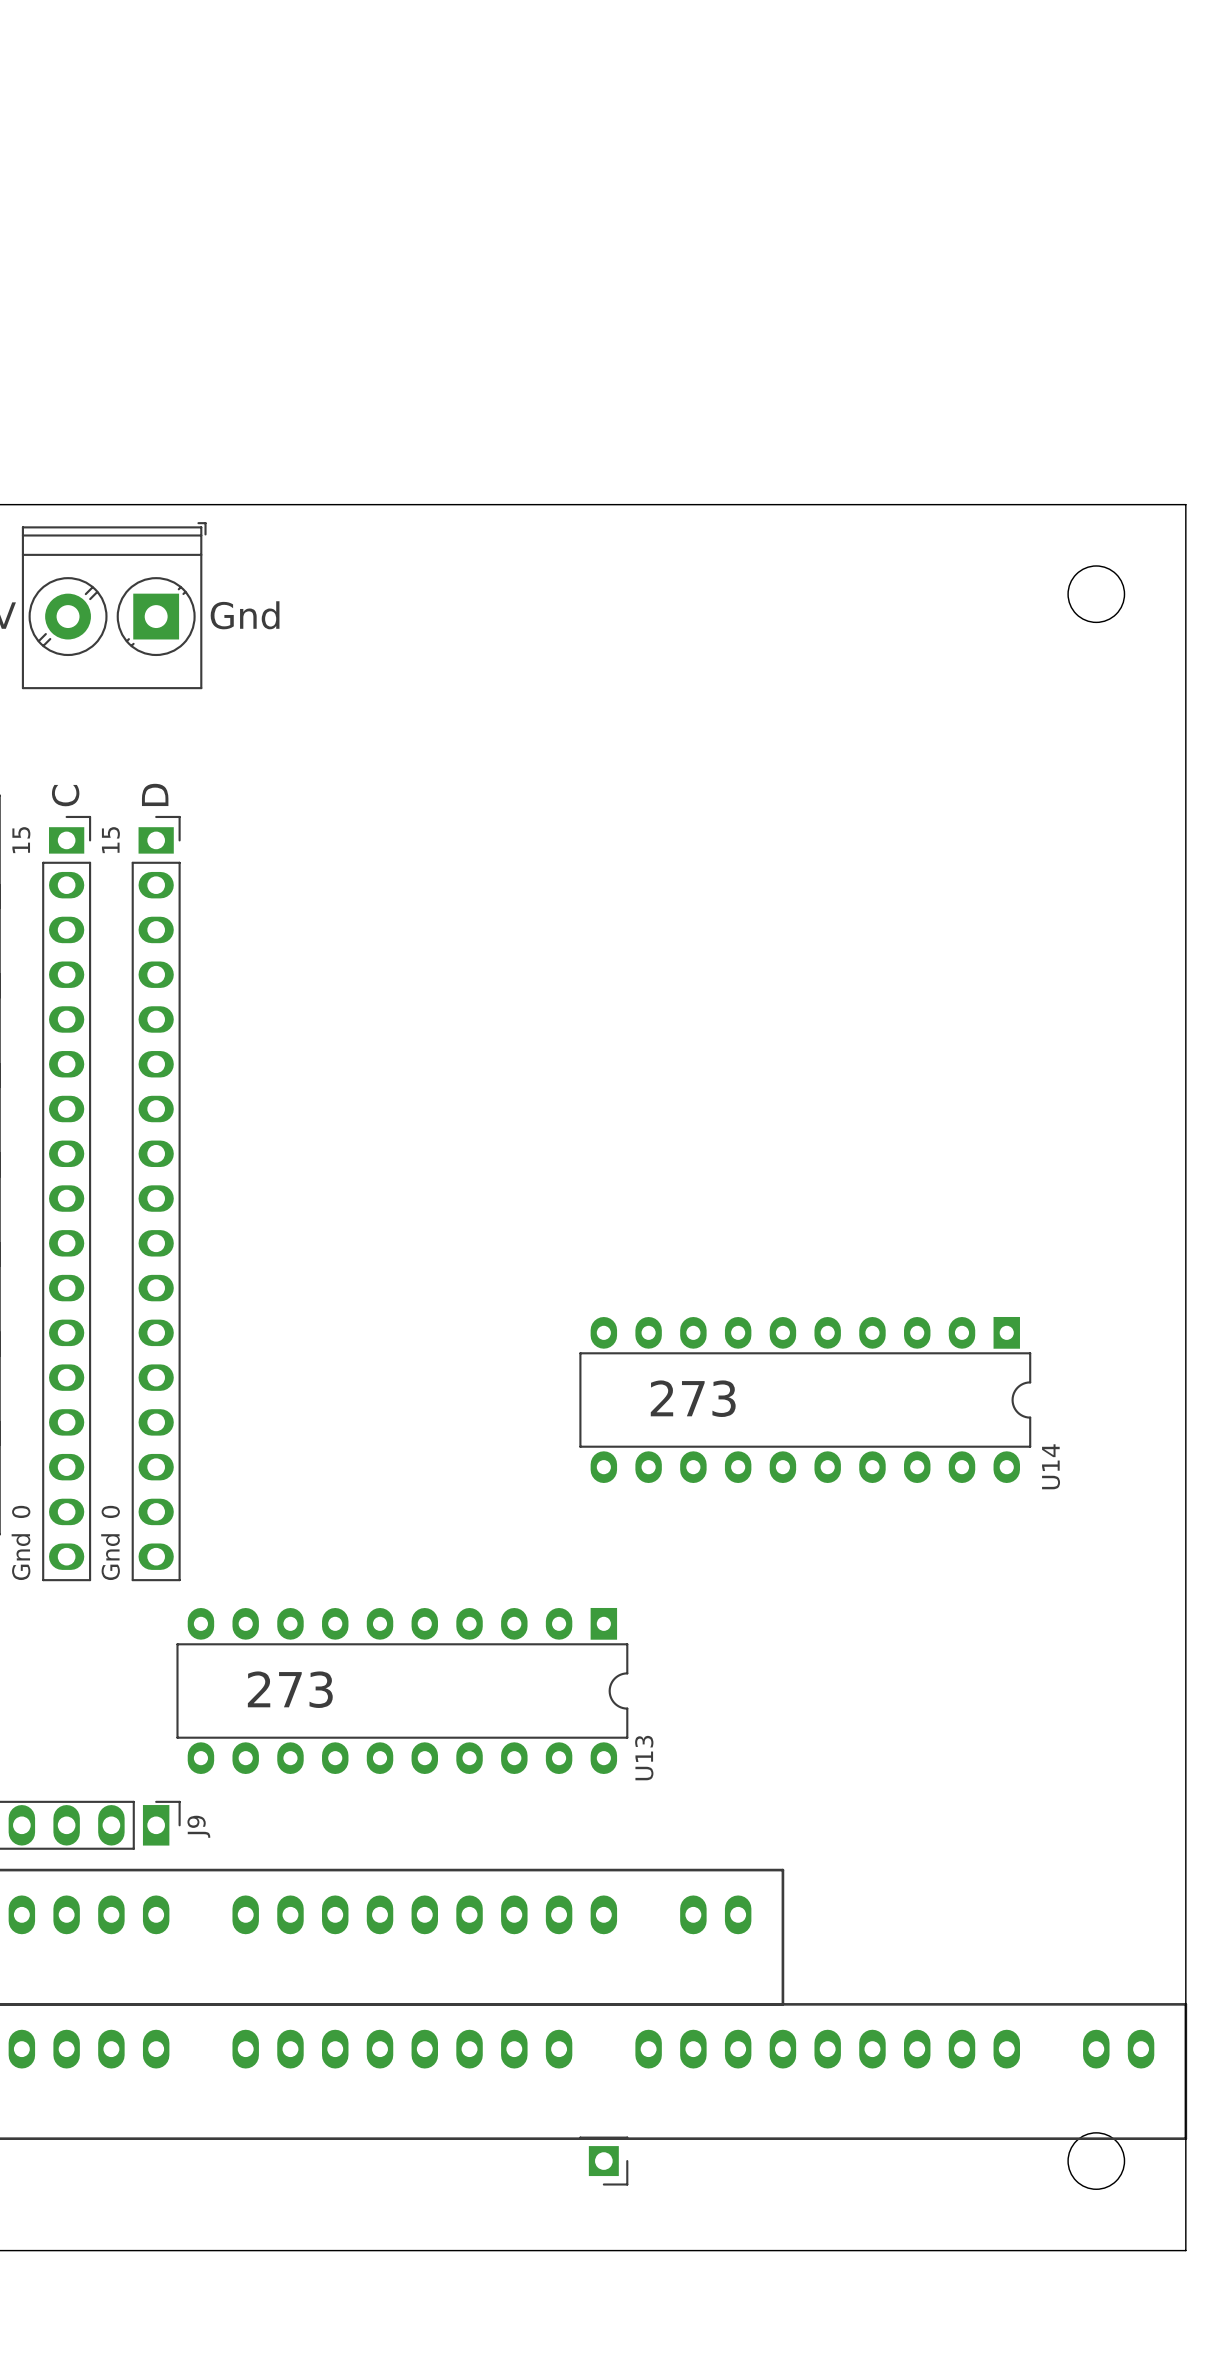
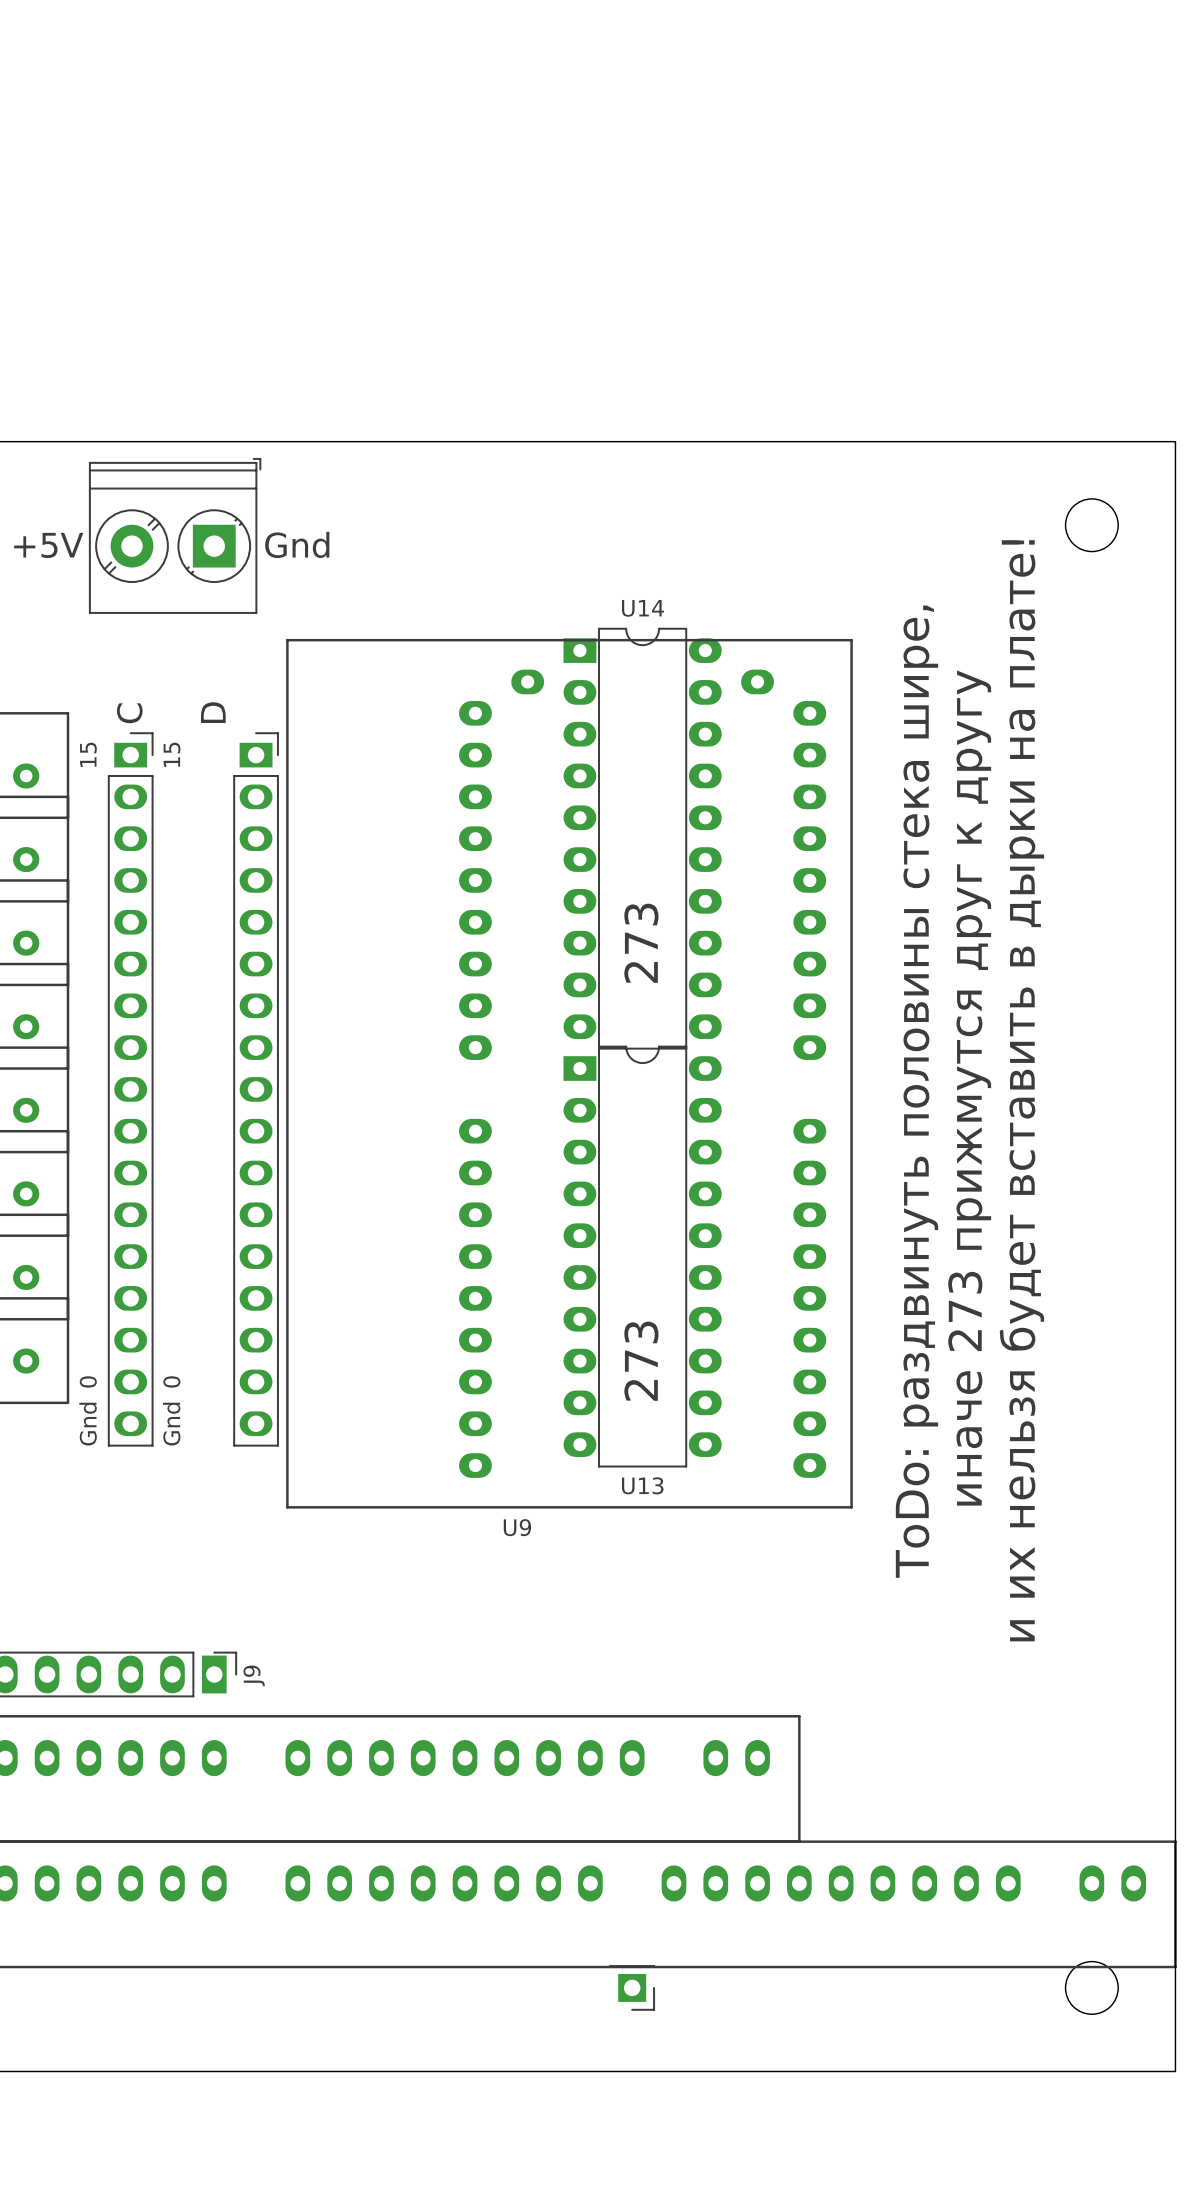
text: none -> 273 (641, 943)
U9: none -> (569, 1073)
text: none -> иначе 273 прижмутся друг к другу (969, 1088)
part position: (156, 1198) -> (256, 1089)
text: none -> ToDo: раздвинуть половины стека шире, (916, 1091)
text: none -> и их нельзя будет вставить в дырки на плате! (1021, 1090)
U14 footprint: [579, 1316, 1032, 1484] -> [563, 627, 722, 1050]
text rotation: 0° (693, 1398) -> 90° counterclockwise (641, 1361)
U14 name position: U14 (1051, 1466) -> U14 (642, 608)
U13 footprint: [176, 1607, 629, 1775] -> [563, 1045, 722, 1468]
text: 273 (290, 1689) -> none
U13 name position: U13 (644, 1758) -> U13 (642, 1485)

